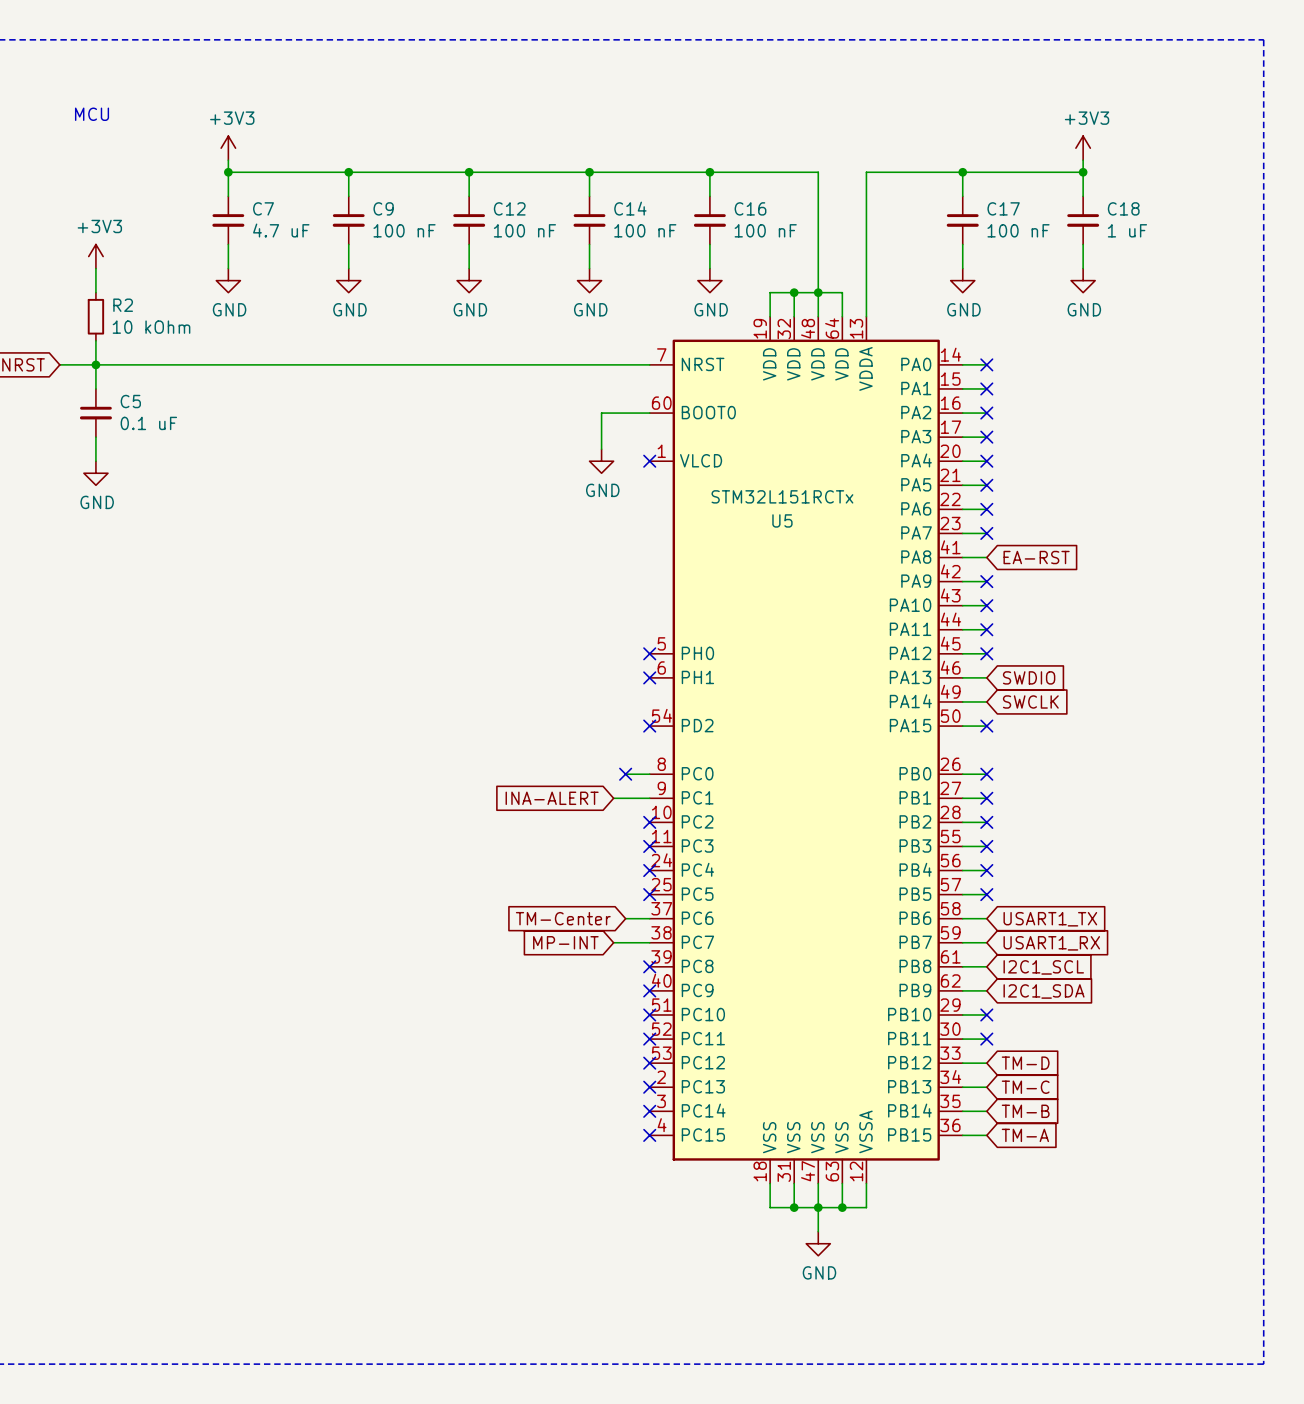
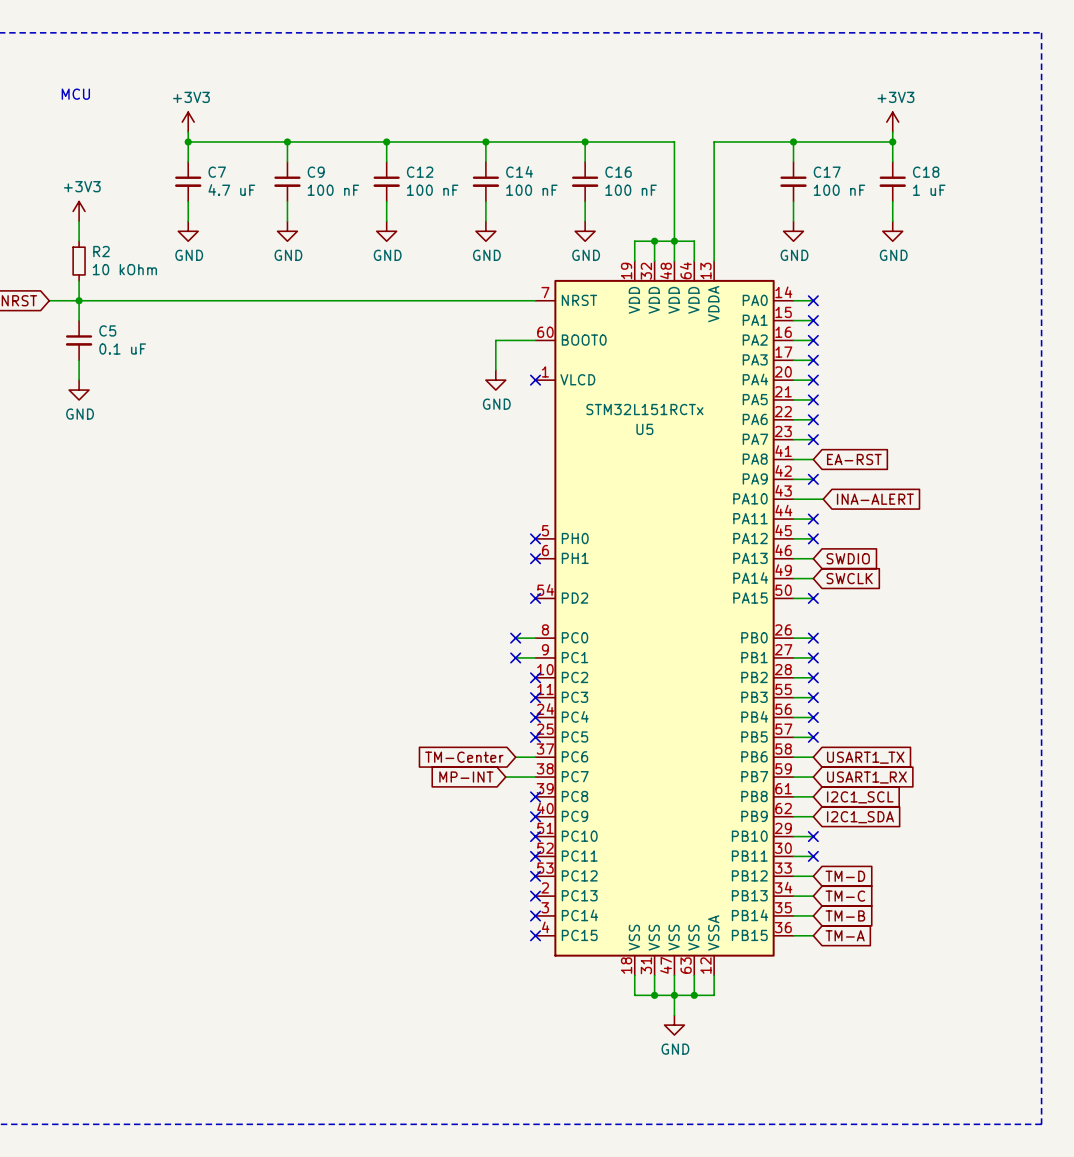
wire: none -> (813, 499) (823, 499)
no-connect mark: (986, 605) -> none
global label: none -> INA-ALERT (875, 499)
global label: INA-ALERT (552, 798) -> none
wire: (613, 798) (625, 798) -> none
no-connect mark: none -> (515, 657)

